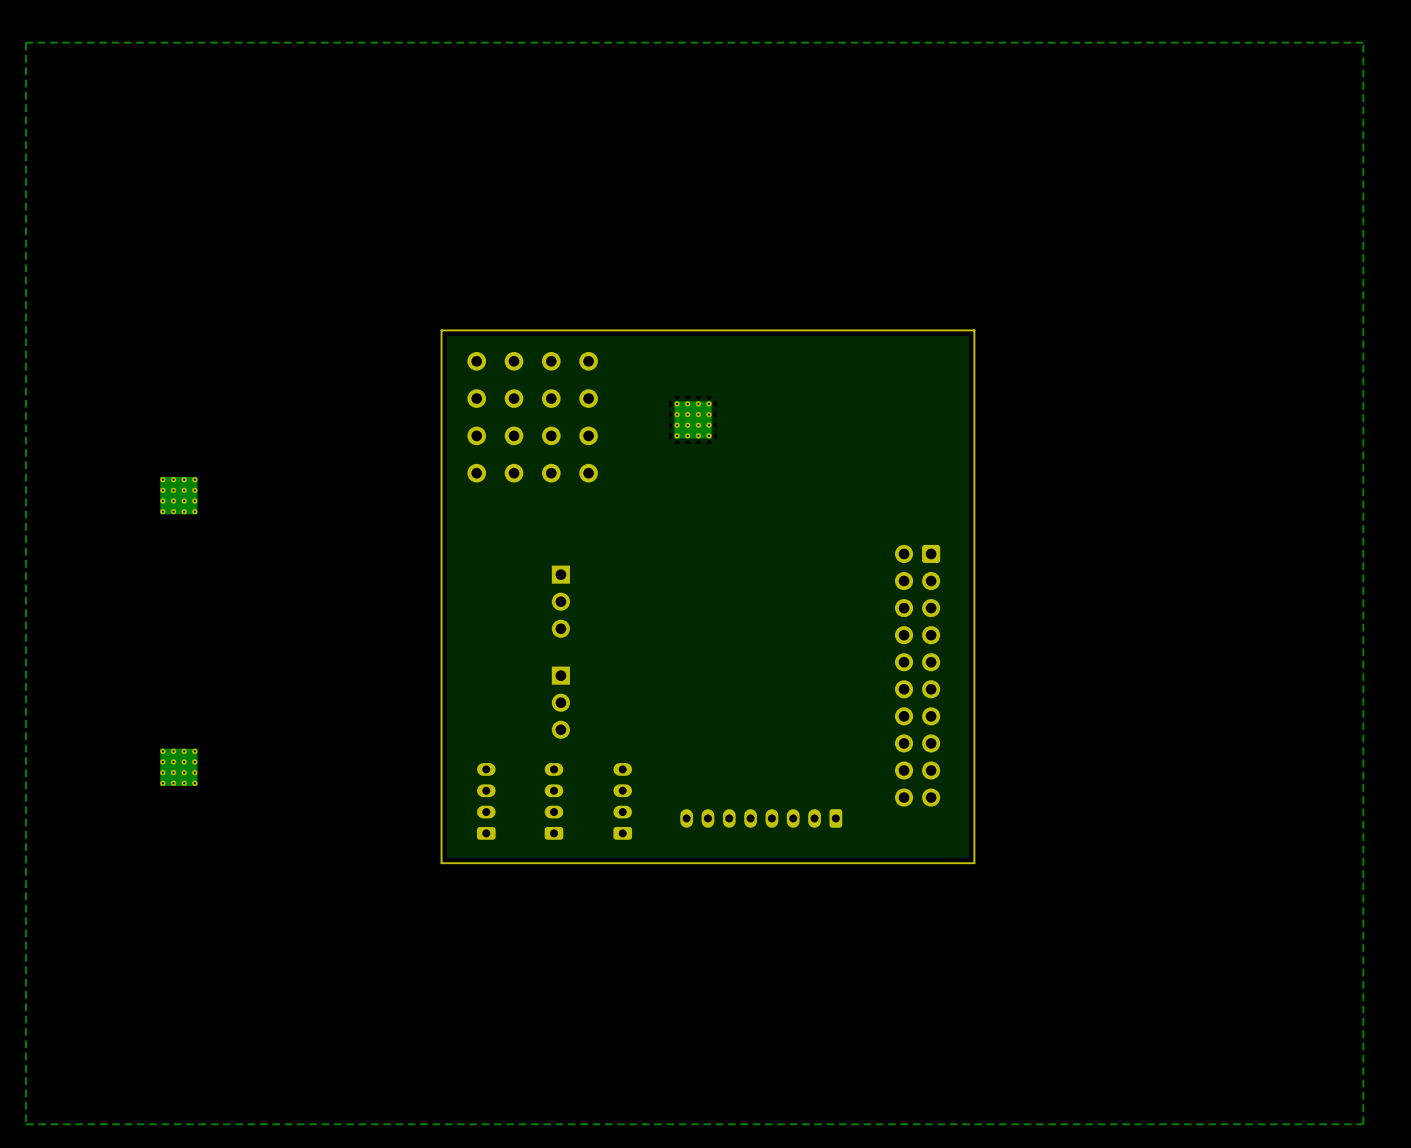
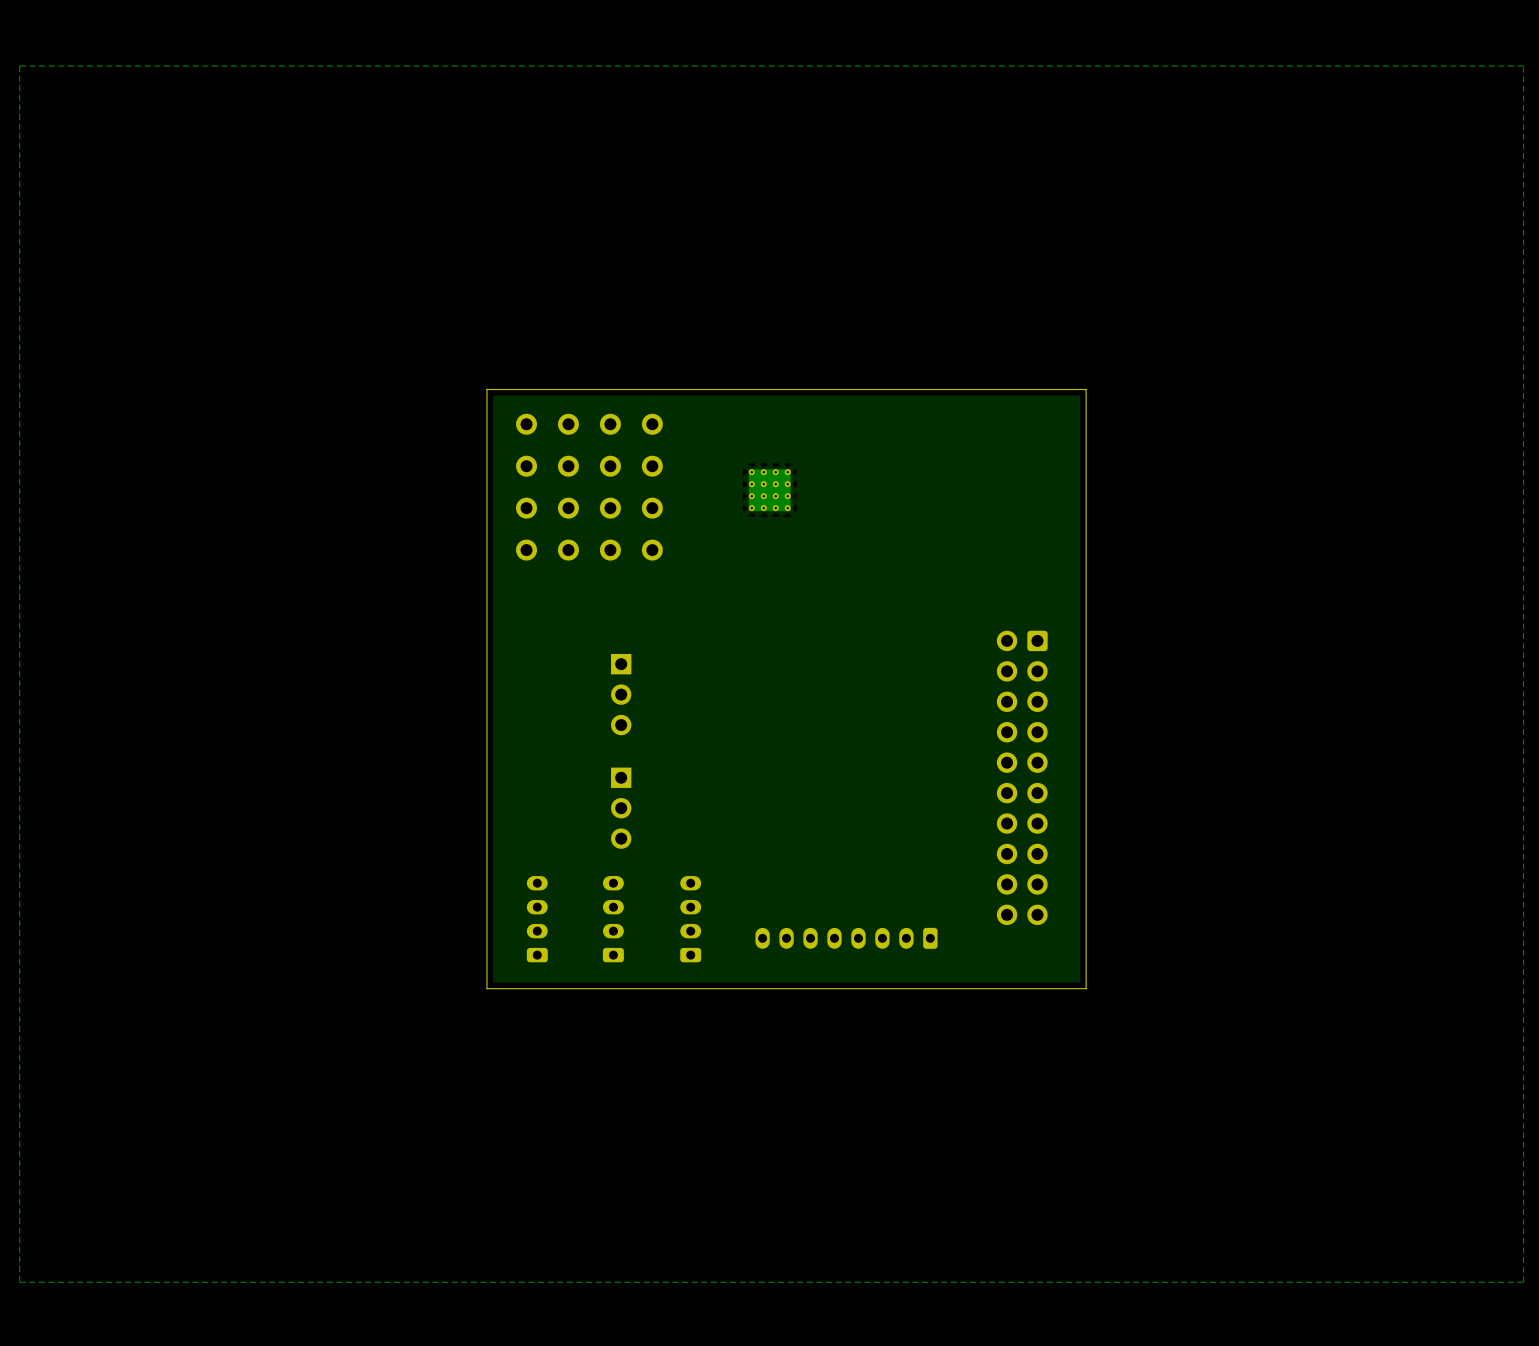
part: (178, 495) -> none
part: (178, 767) -> none

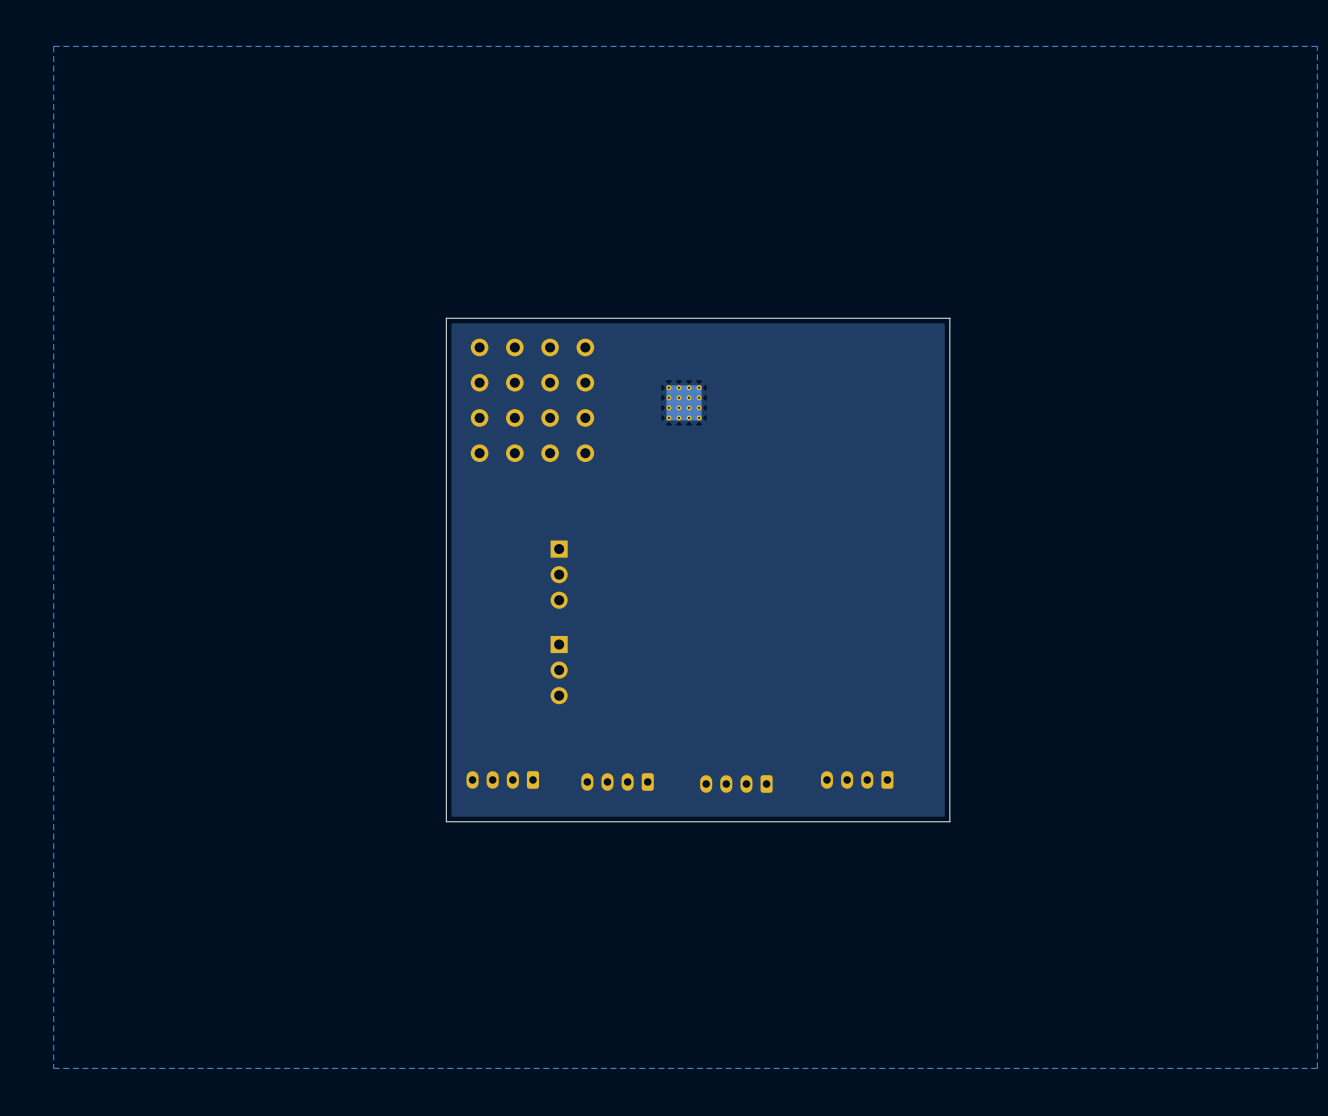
part: (1022, 777) -> none
part rotation: 0° (537, 919) -> 90° counterclockwise (502, 779)
part: (613, 919) -> none
part rotation: 0° (690, 919) -> 90° counterclockwise (617, 781)
part: (846, 938) -> none
part: none -> (857, 779)
part: none -> (736, 783)

